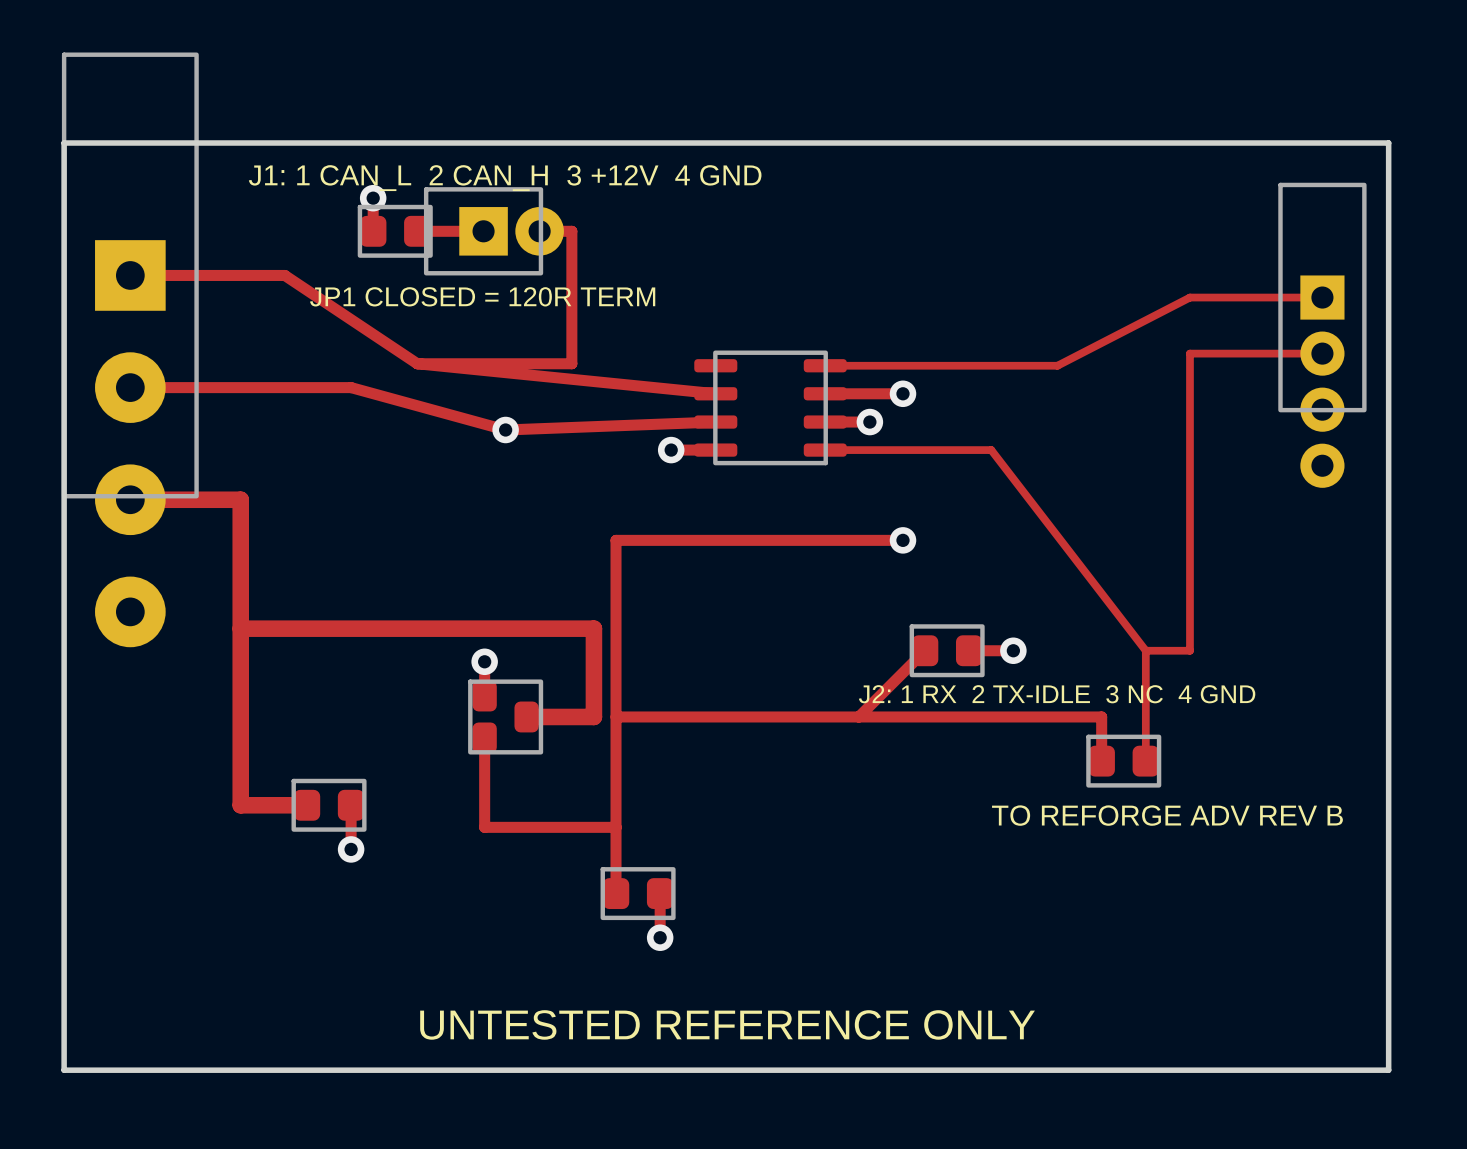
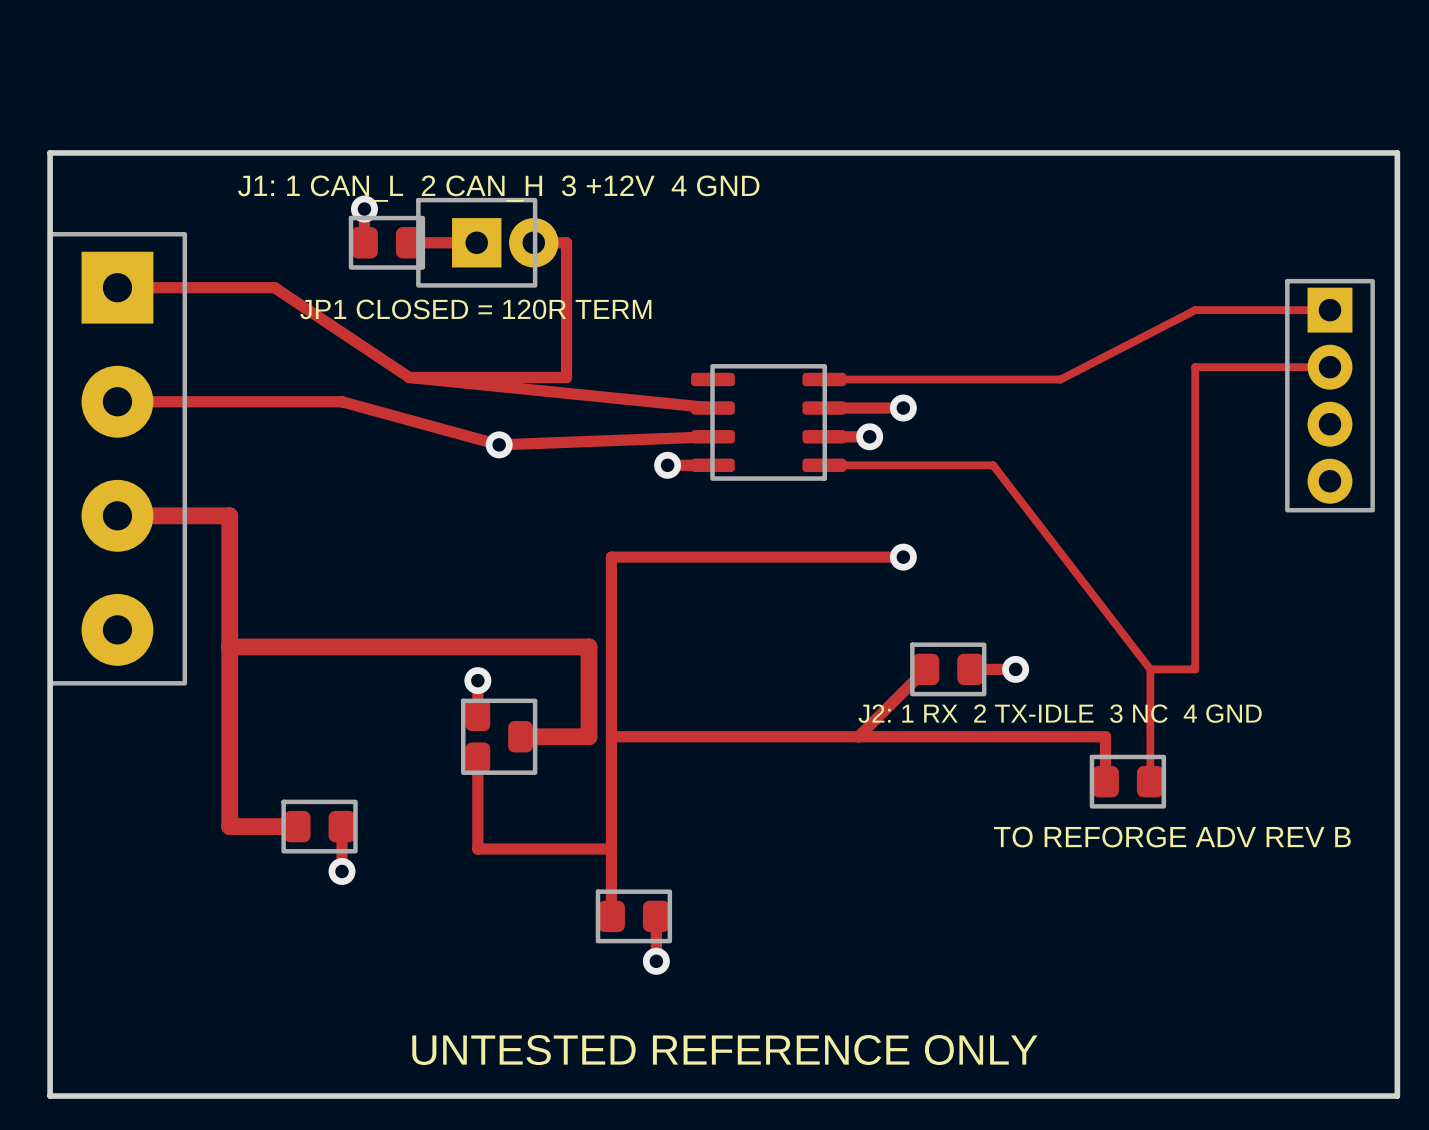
part: (1322, 335) -> none
part: (130, 349) -> none
part: none -> (1330, 395)
part: none -> (117, 458)

